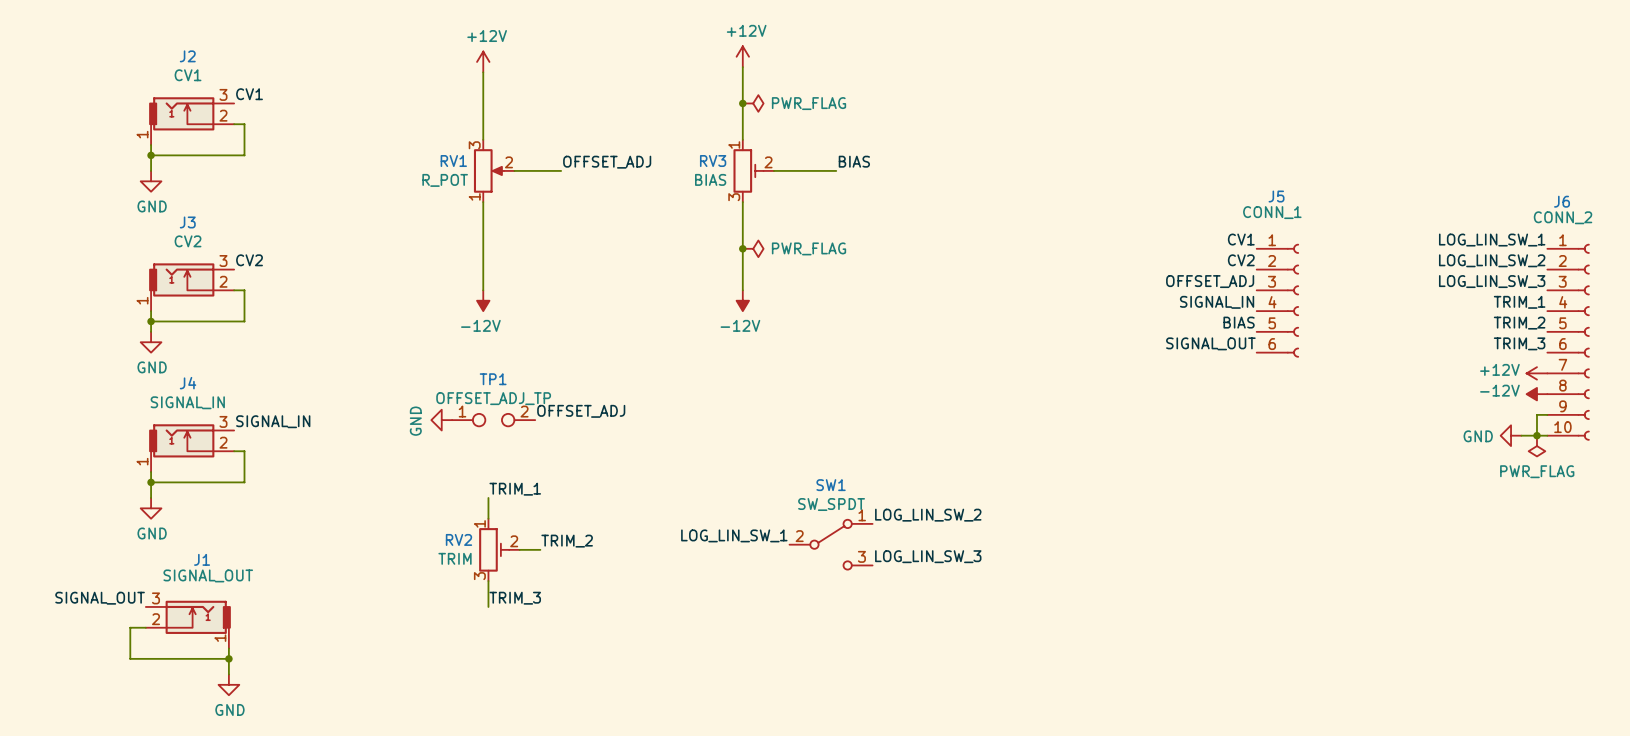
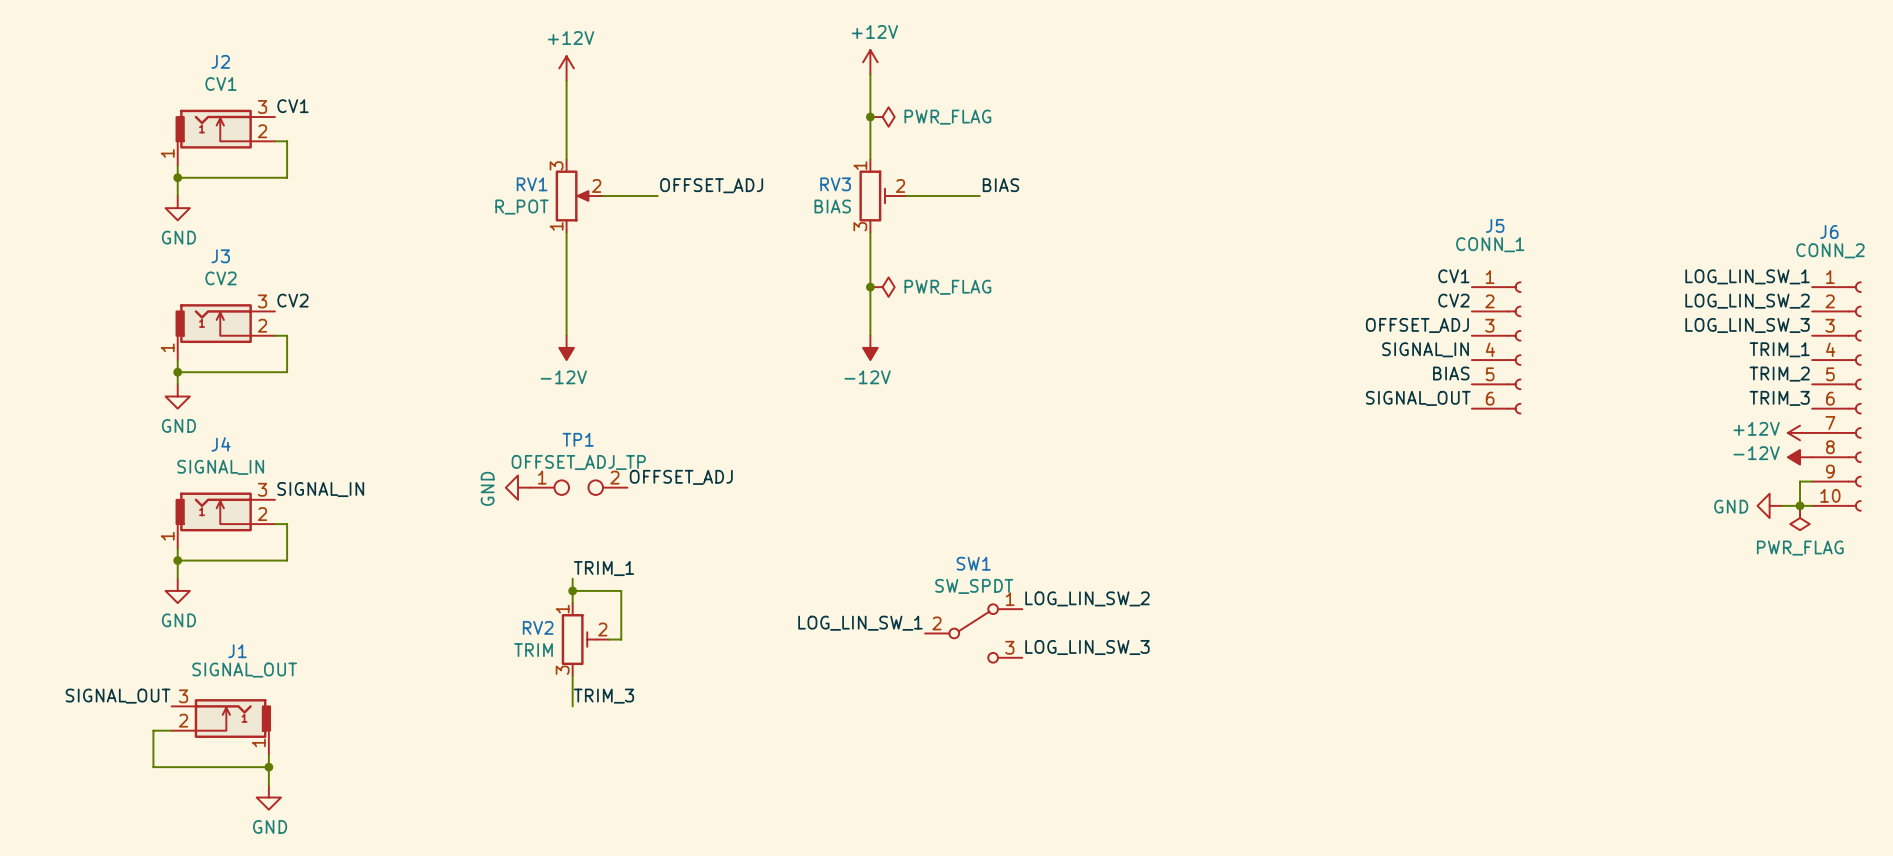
junction: none -> (572, 590)
label: TRIM_2 (567, 541) -> none
wire: (529, 549) (540, 549) -> (621, 639) (621, 590) (572, 590)

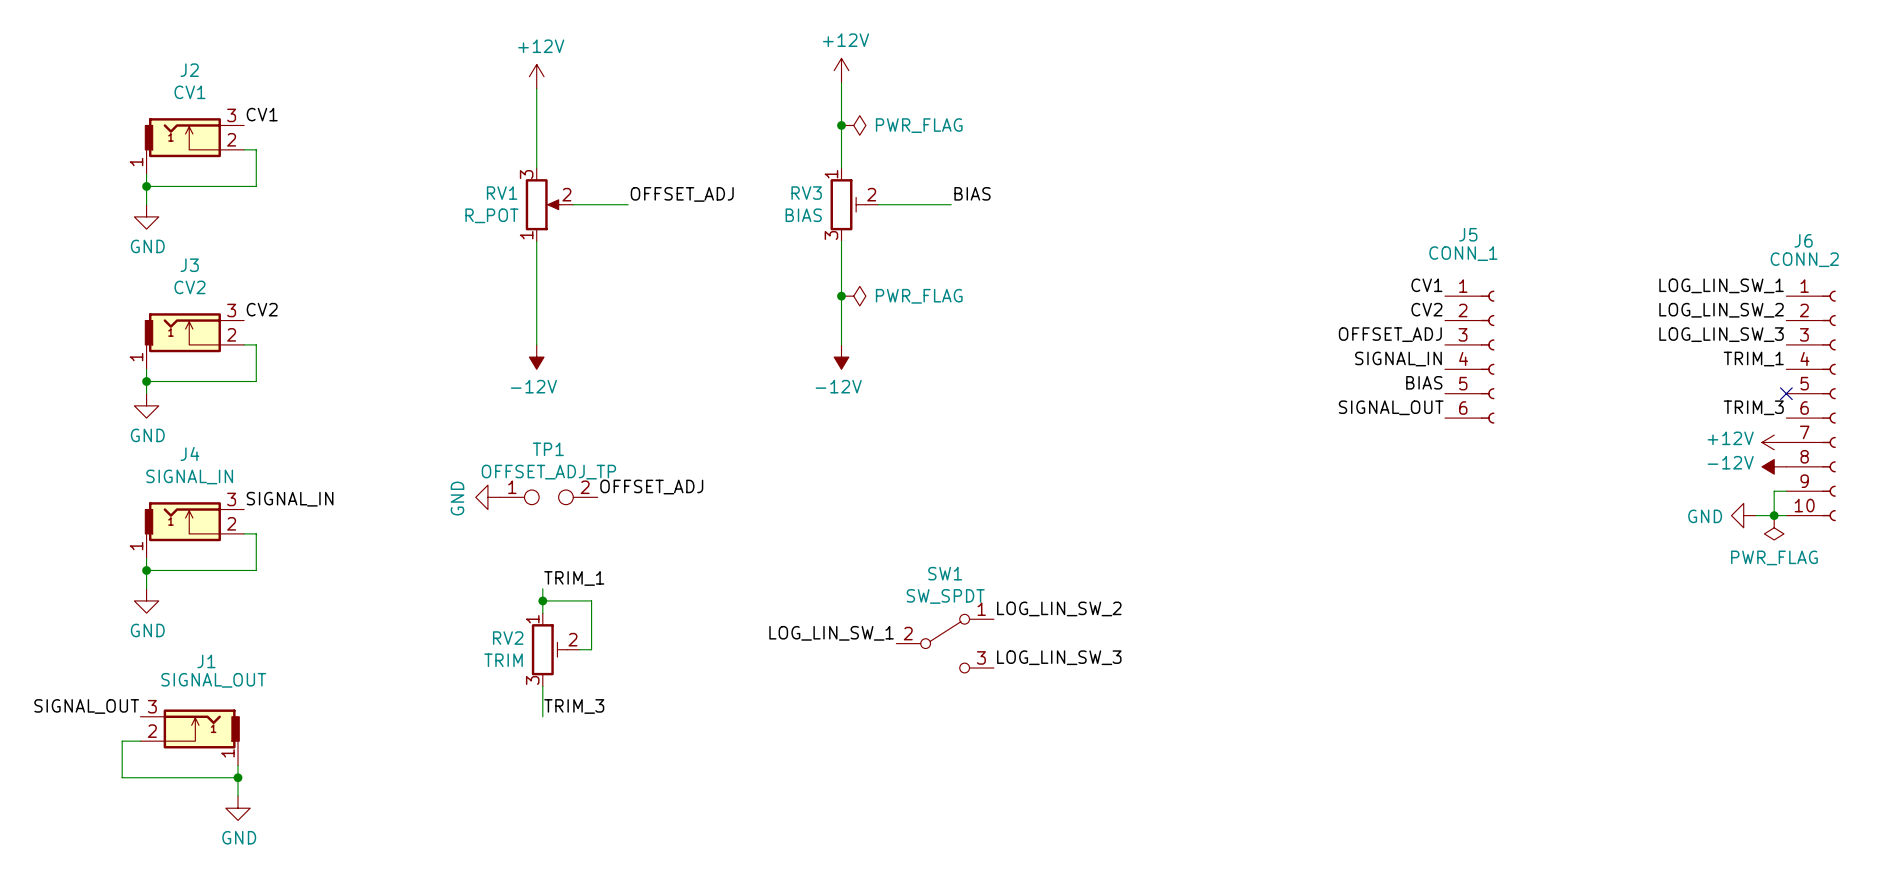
label: TRIM_2 (1779, 374) -> none
no-connect mark: none -> (1786, 393)

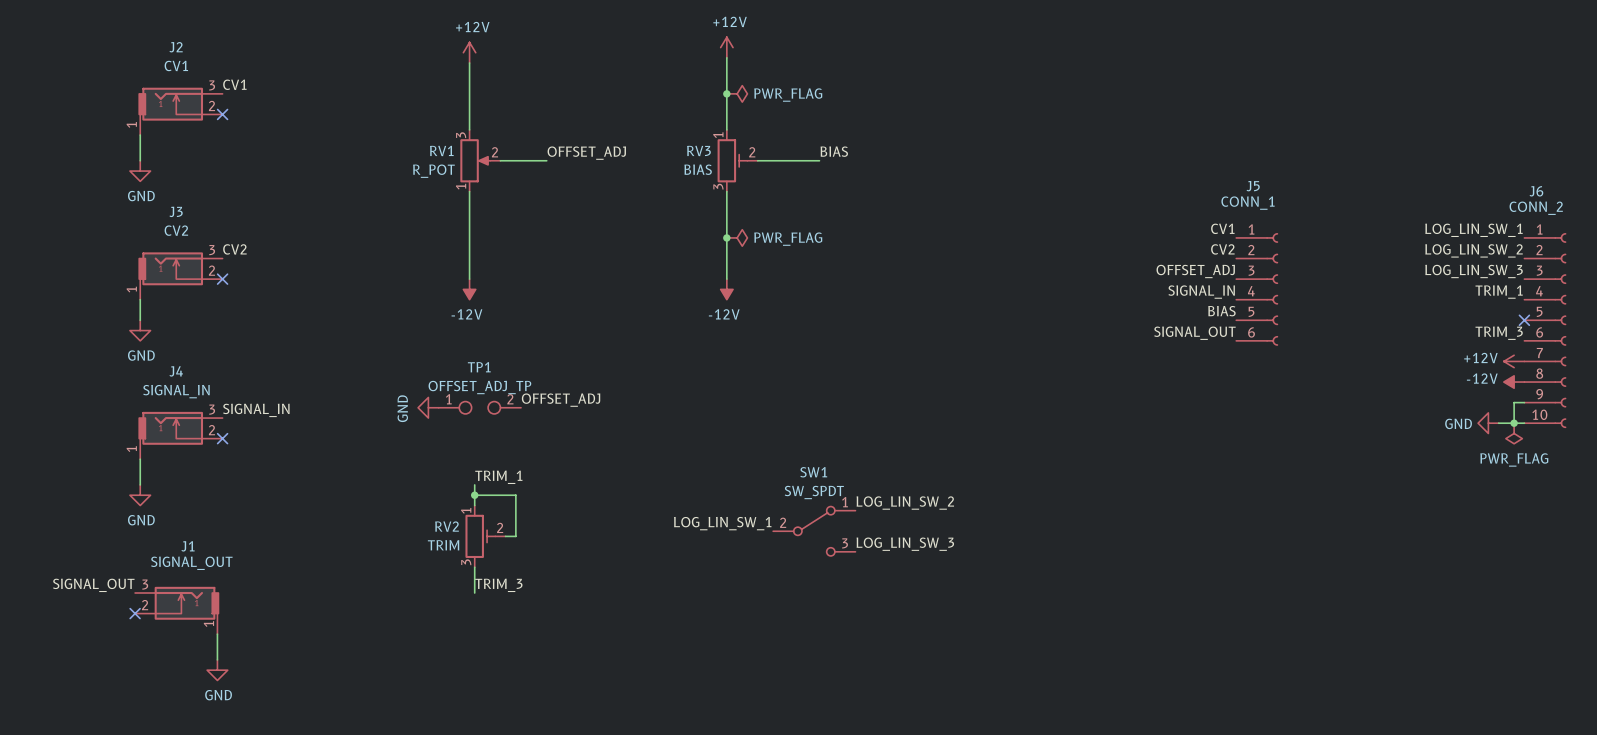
wire: (244, 149) (256, 149) (256, 186) (146, 186) -> none
no-connect mark: none -> (222, 114)
junction: (146, 186) -> none
wire: (244, 344) (256, 344) (256, 381) (146, 381) -> none
no-connect mark: none -> (222, 279)
junction: (146, 381) -> none
wire: (244, 533) (256, 533) (256, 570) (146, 570) -> none
no-connect mark: none -> (222, 438)
junction: (146, 570) -> none
wire: (140, 741) (122, 741) (122, 777) (238, 777) -> none
no-connect mark: none -> (135, 613)
junction: (238, 777) -> none

